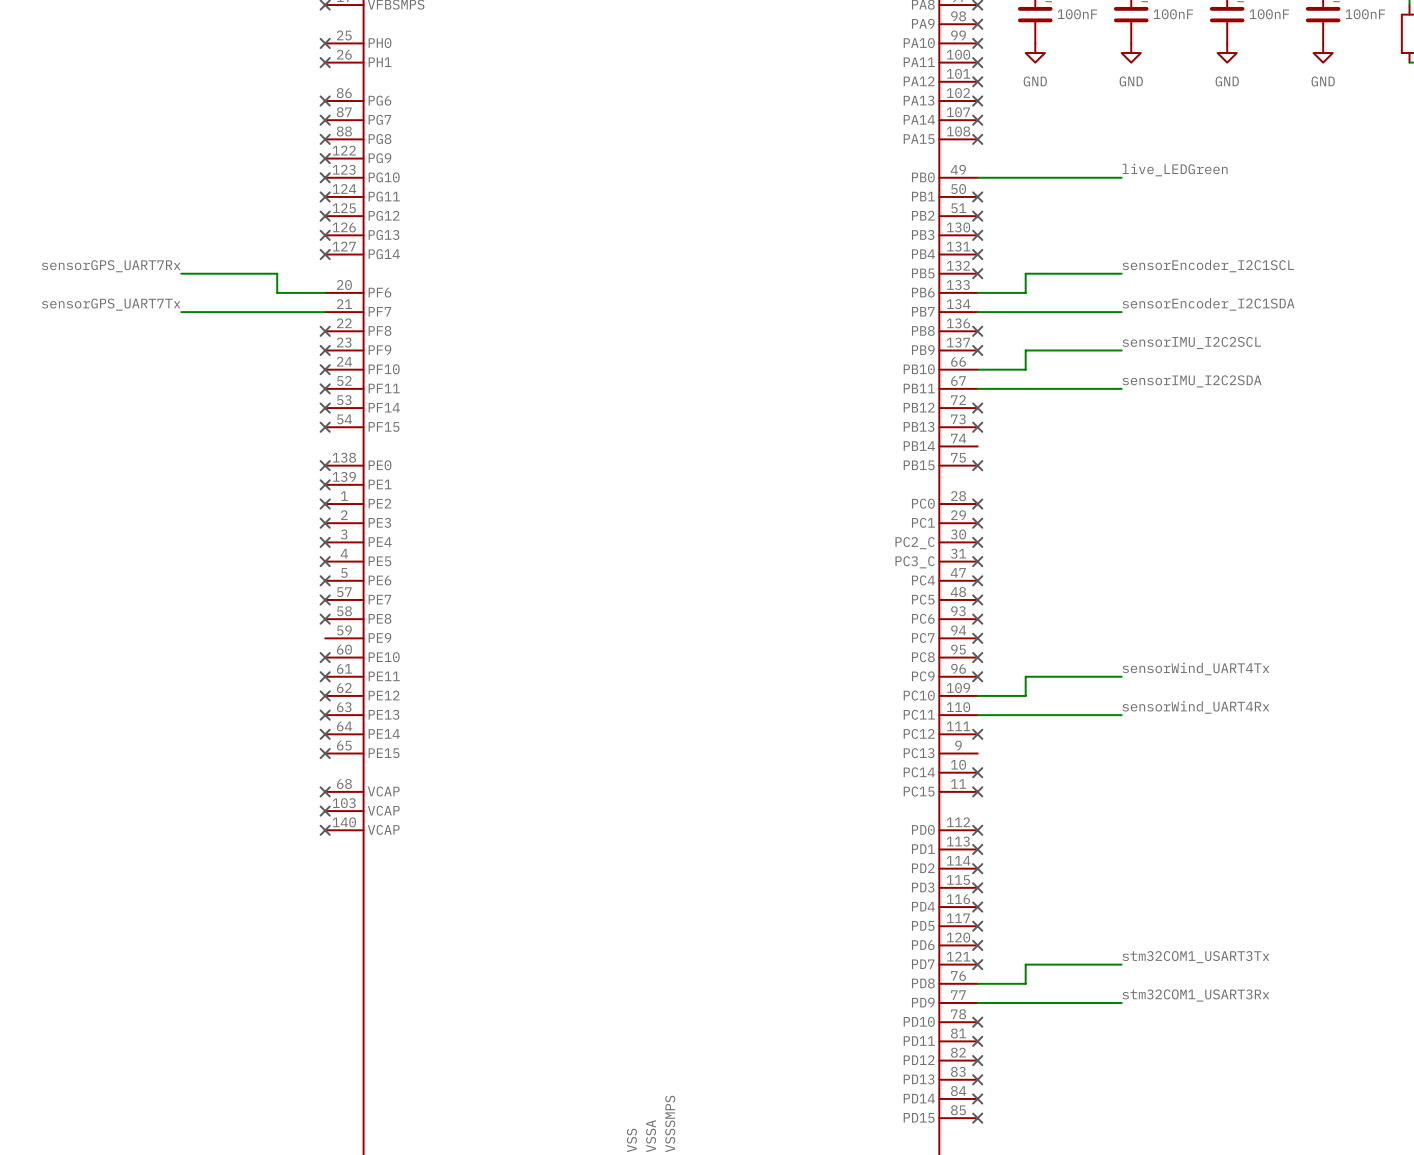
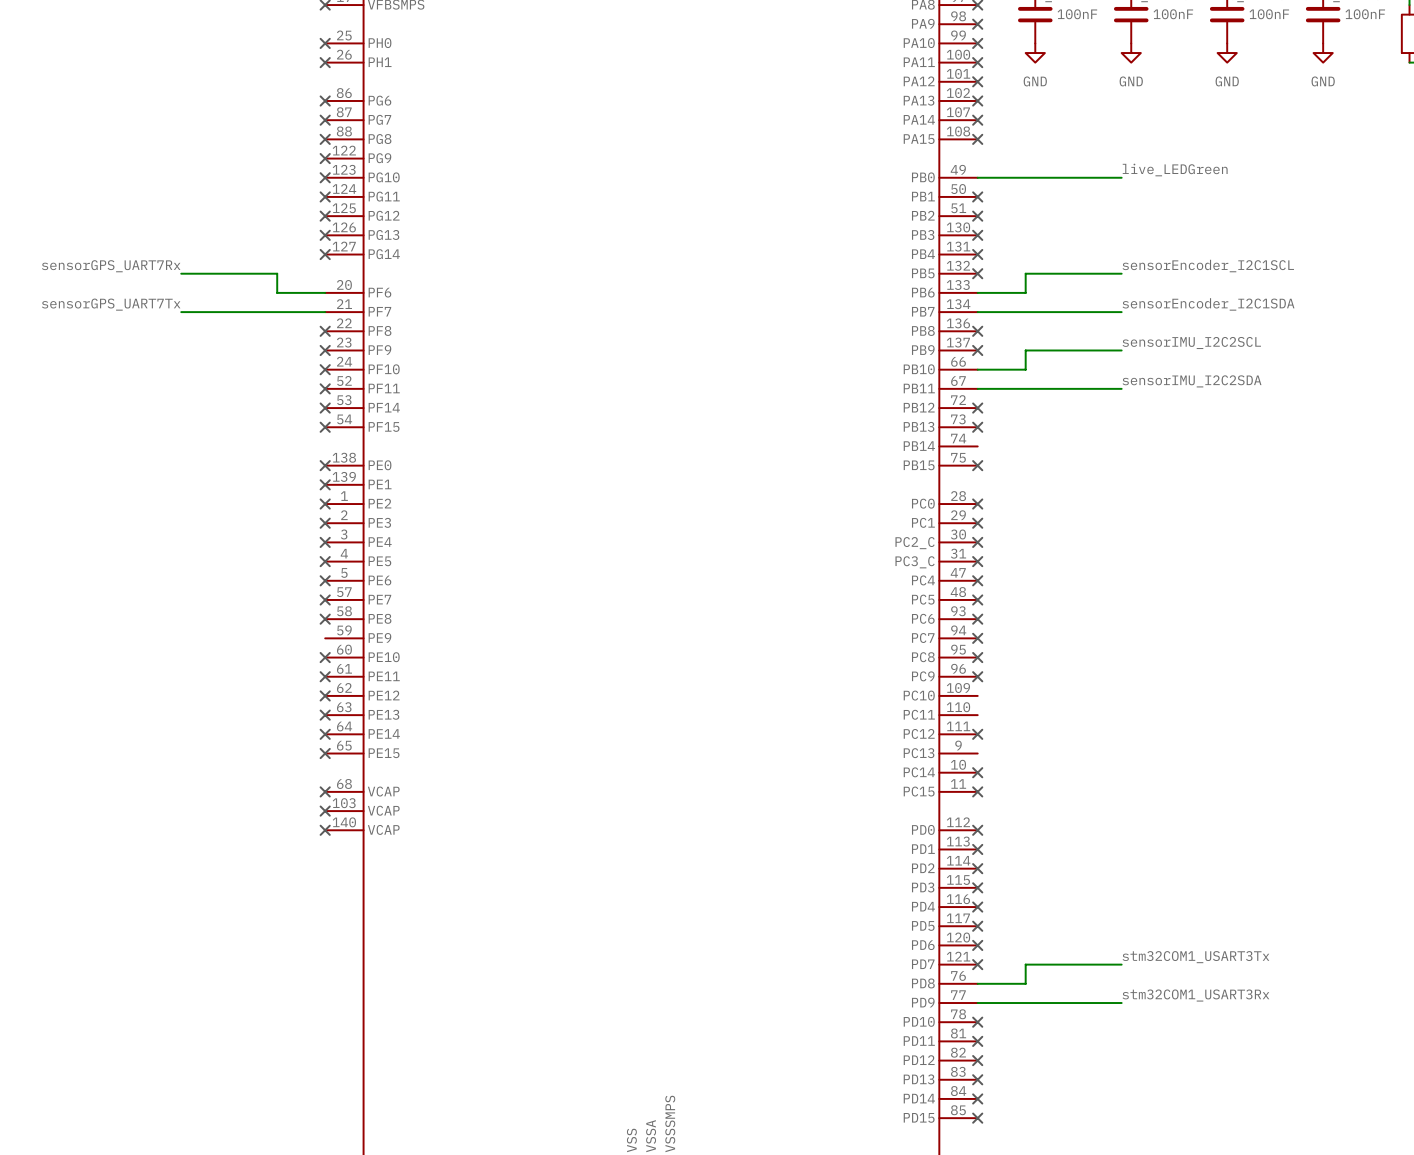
label: sensorWind_UART4Tx (1195, 669) -> none
wire: (1121, 676) (1025, 676) (1025, 695) (977, 695) -> none
label: sensorWind_UART4Rx (1195, 707) -> none
wire: (977, 715) (1121, 715) -> none

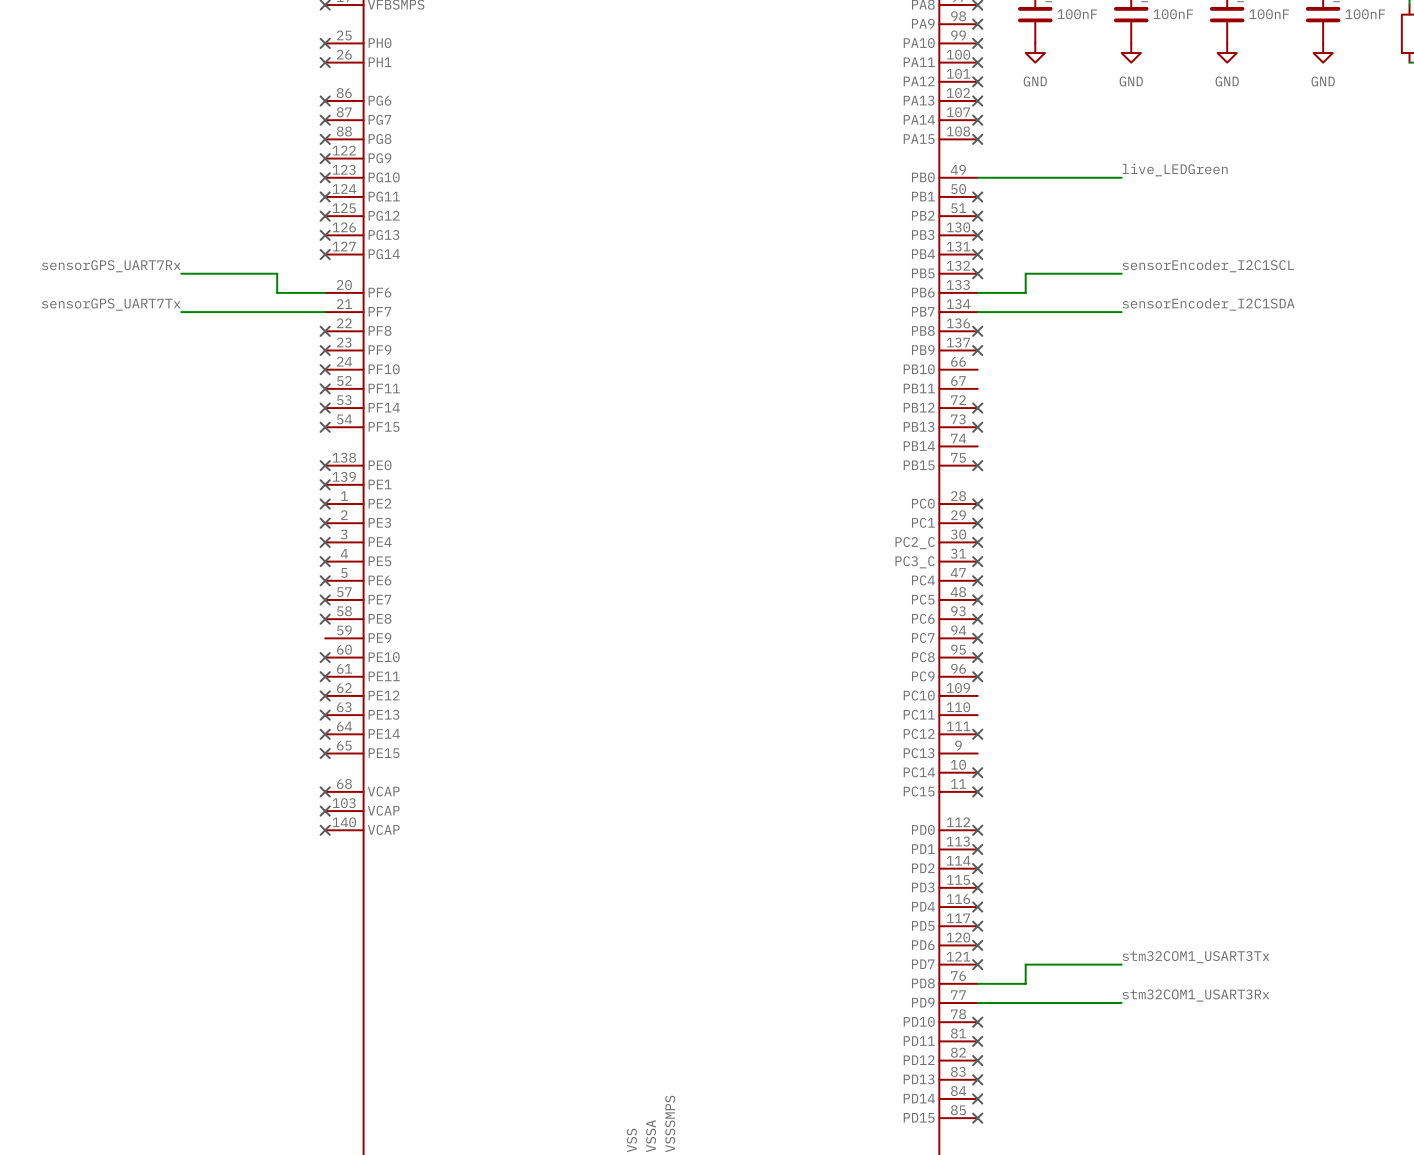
label: sensorIMU_I2C2SCL (1191, 343) -> none
wire: (1121, 350) (1025, 350) (1025, 369) (977, 369) -> none
label: sensorIMU_I2C2SDA (1192, 381) -> none
wire: (977, 388) (1121, 388) -> none

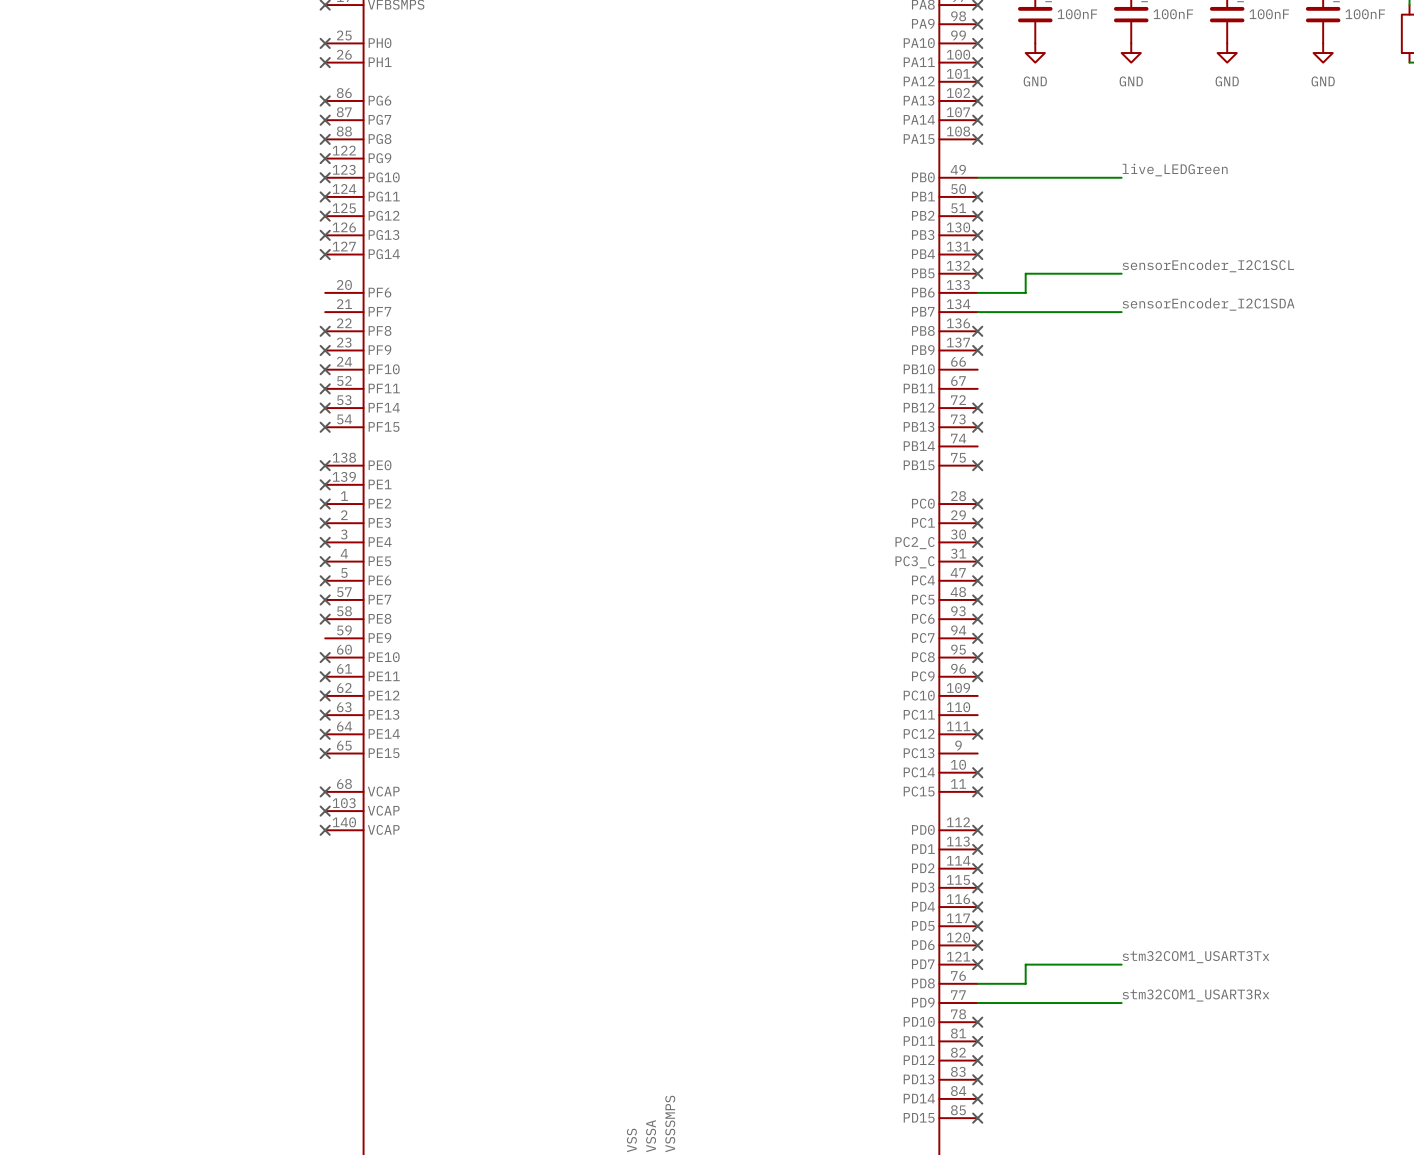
label: sensorGPS_UART7Rx (111, 266) -> none
wire: (181, 273) (277, 273) (277, 292) (325, 292) -> none
label: sensorGPS_UART7Tx (111, 304) -> none
wire: (181, 312) (325, 312) -> none

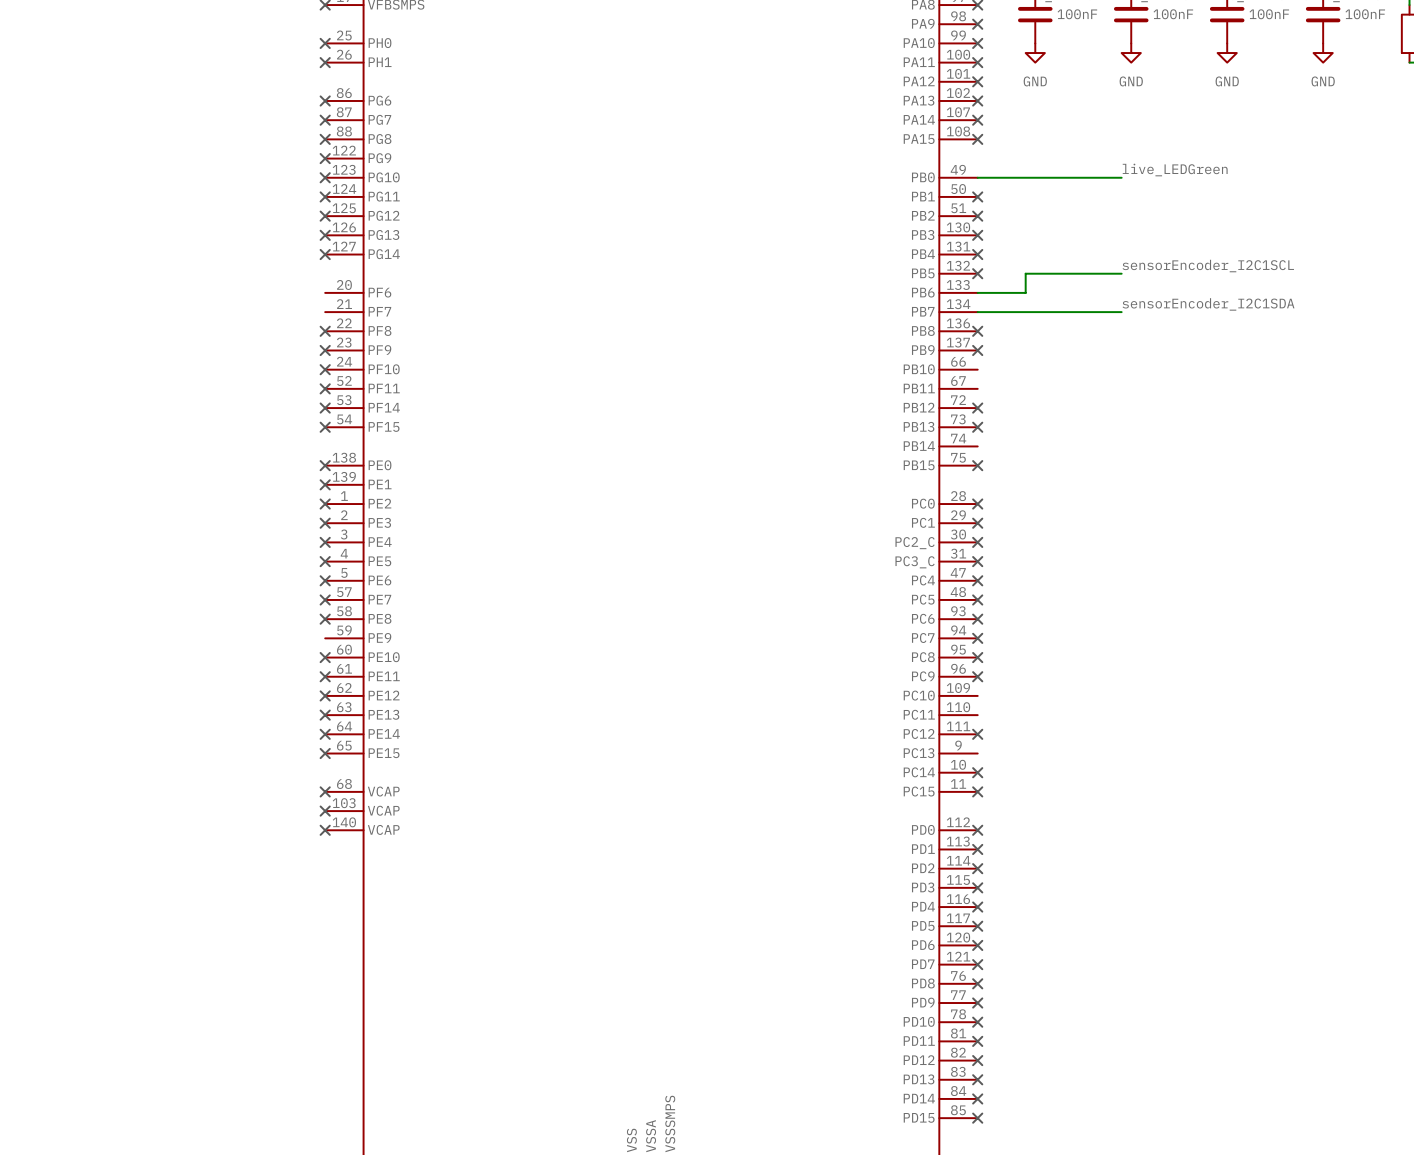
label: stm32COM1_USART3Tx (1195, 957) -> none
wire: (1121, 964) (1025, 964) (1025, 983) (977, 983) -> none
no-connect mark: none -> (977, 983)
label: stm32COM1_USART3Rx (1195, 995) -> none
wire: (977, 1003) (1121, 1003) -> none
no-connect mark: none -> (977, 1003)

